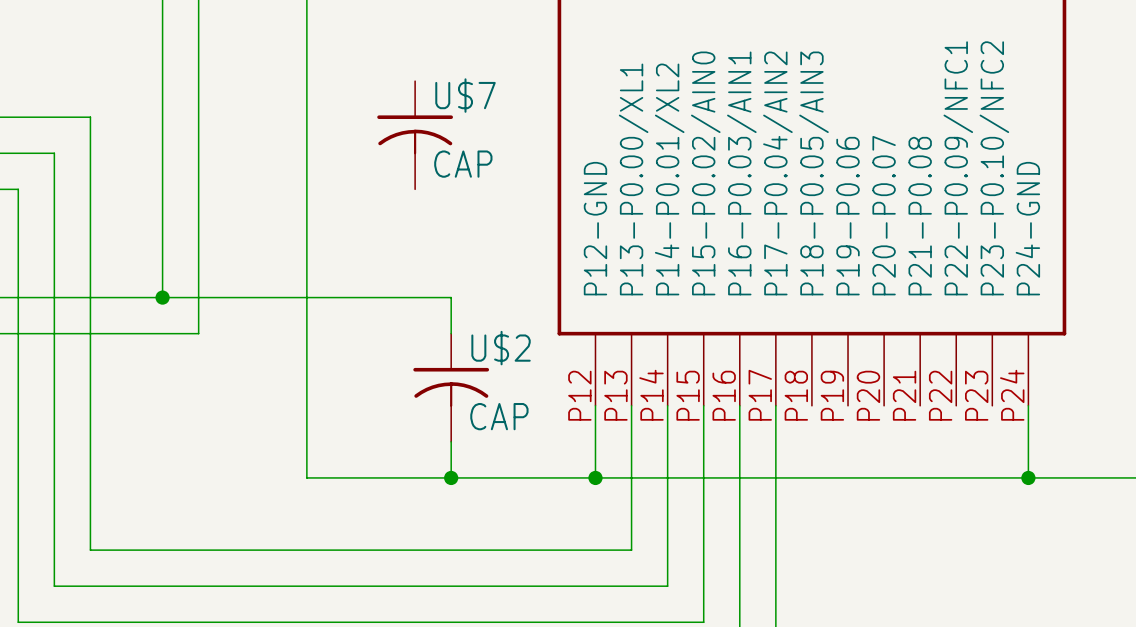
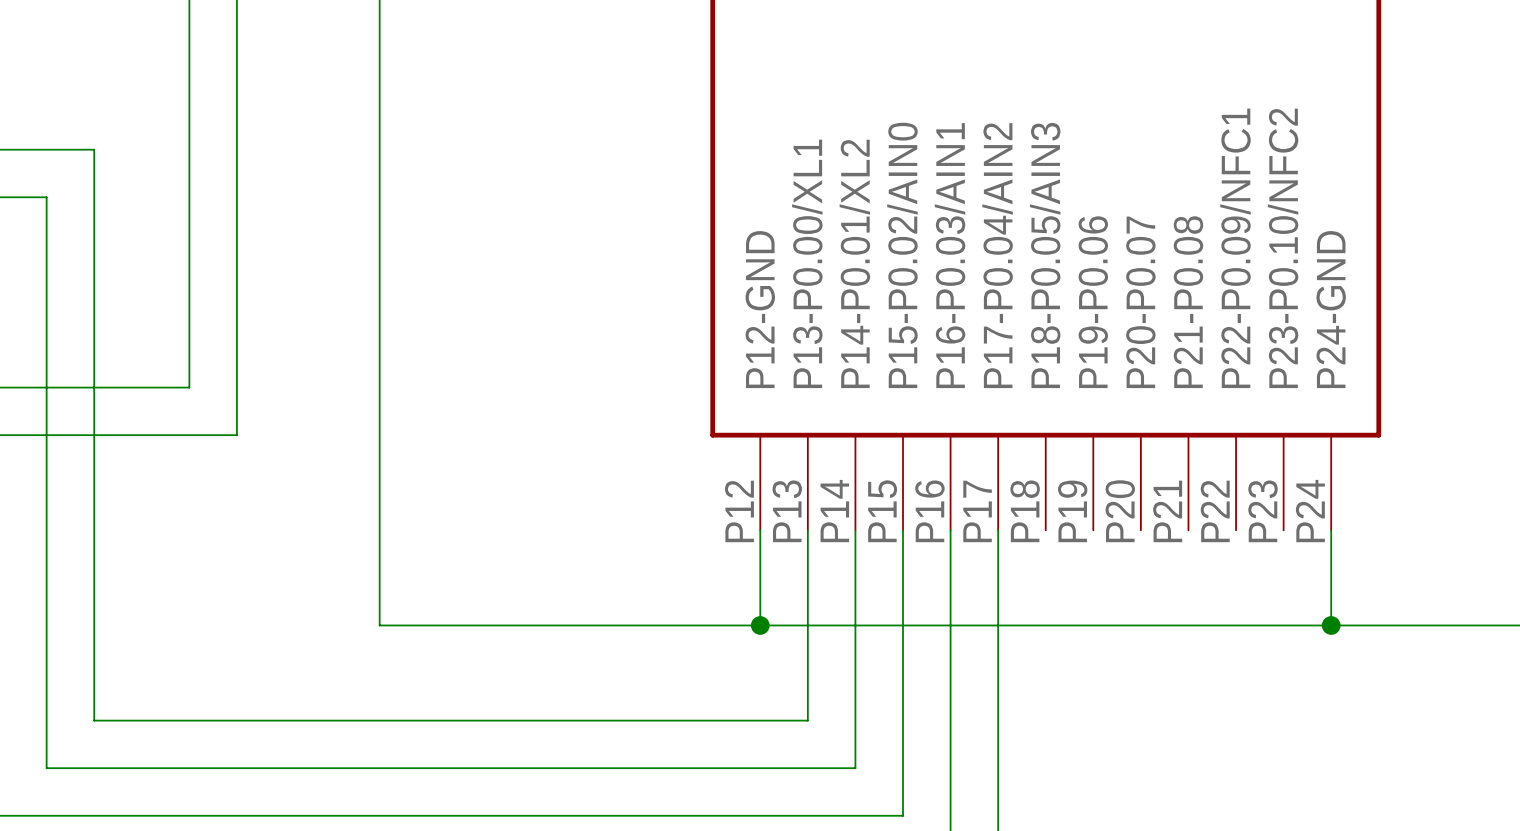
U$7: CAP (415, 135) -> none
wire: (162, 297) (451, 297) (451, 333) -> none
junction: (162, 297) -> none
U$2: CAP (451, 387) -> none
wire: (451, 441) (451, 477) -> none
junction: (451, 477) -> none

